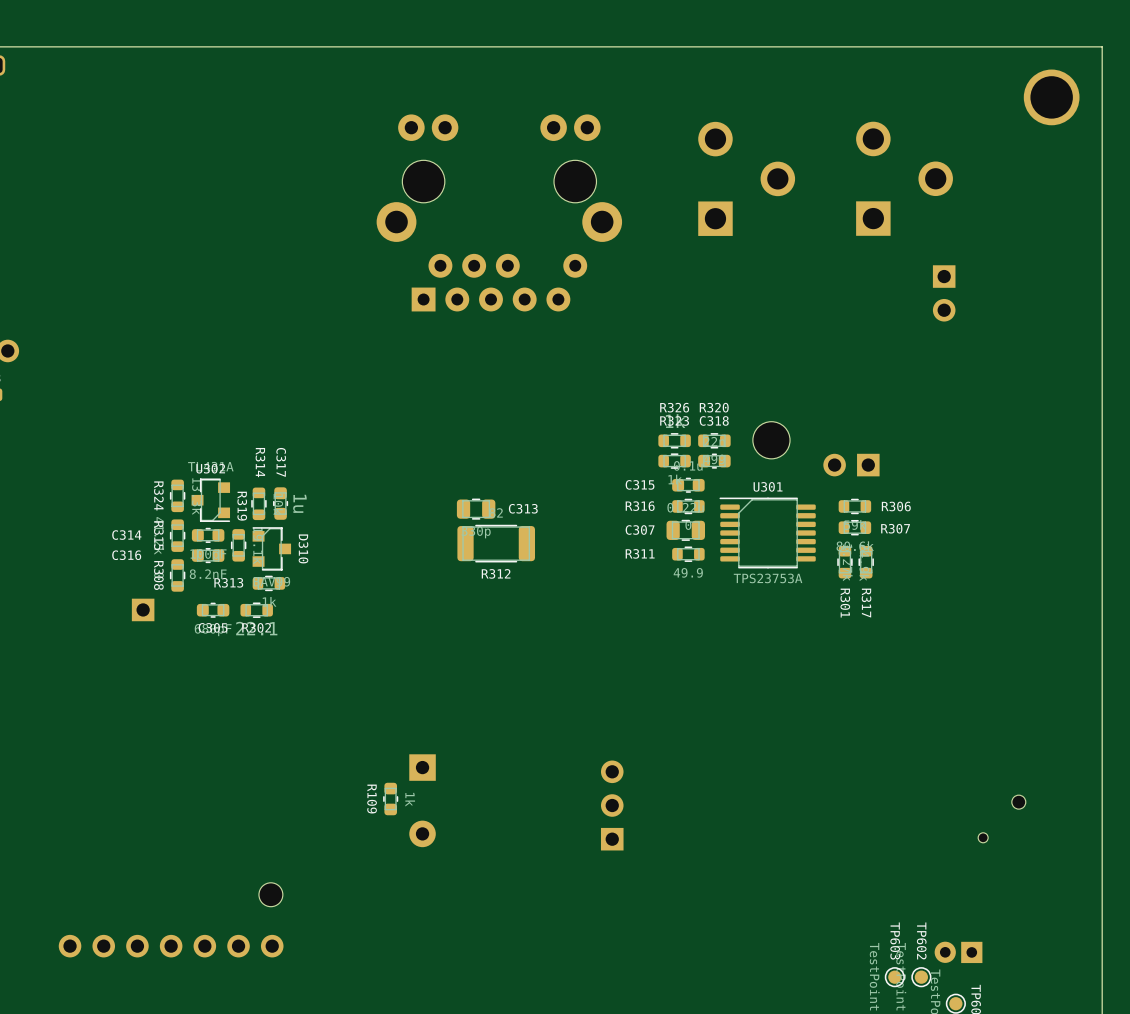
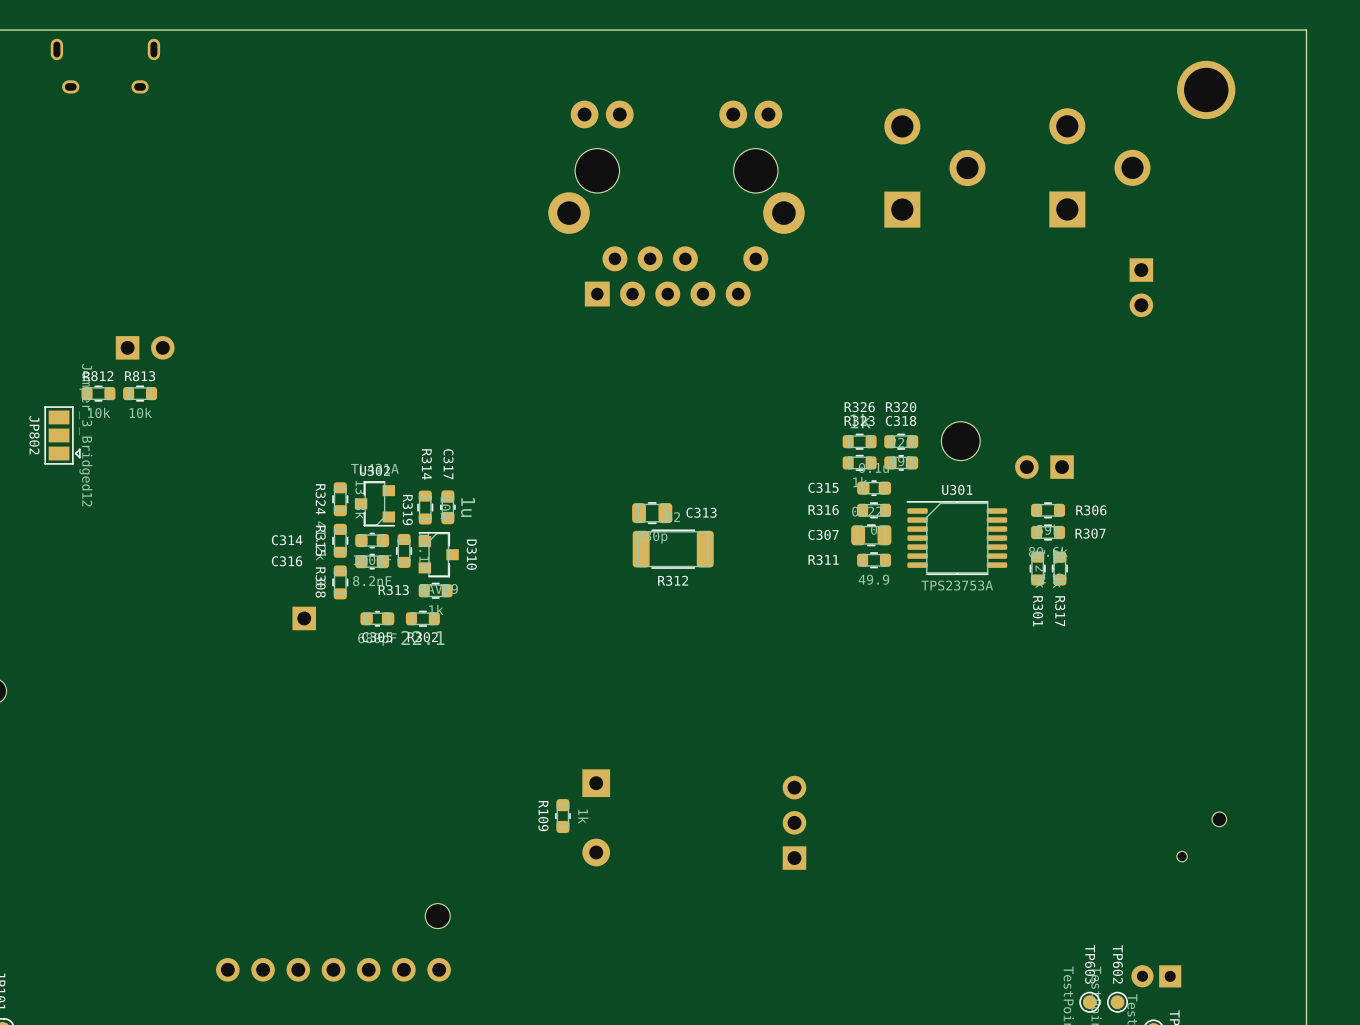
part position: (1051, 97) -> (1206, 89)

